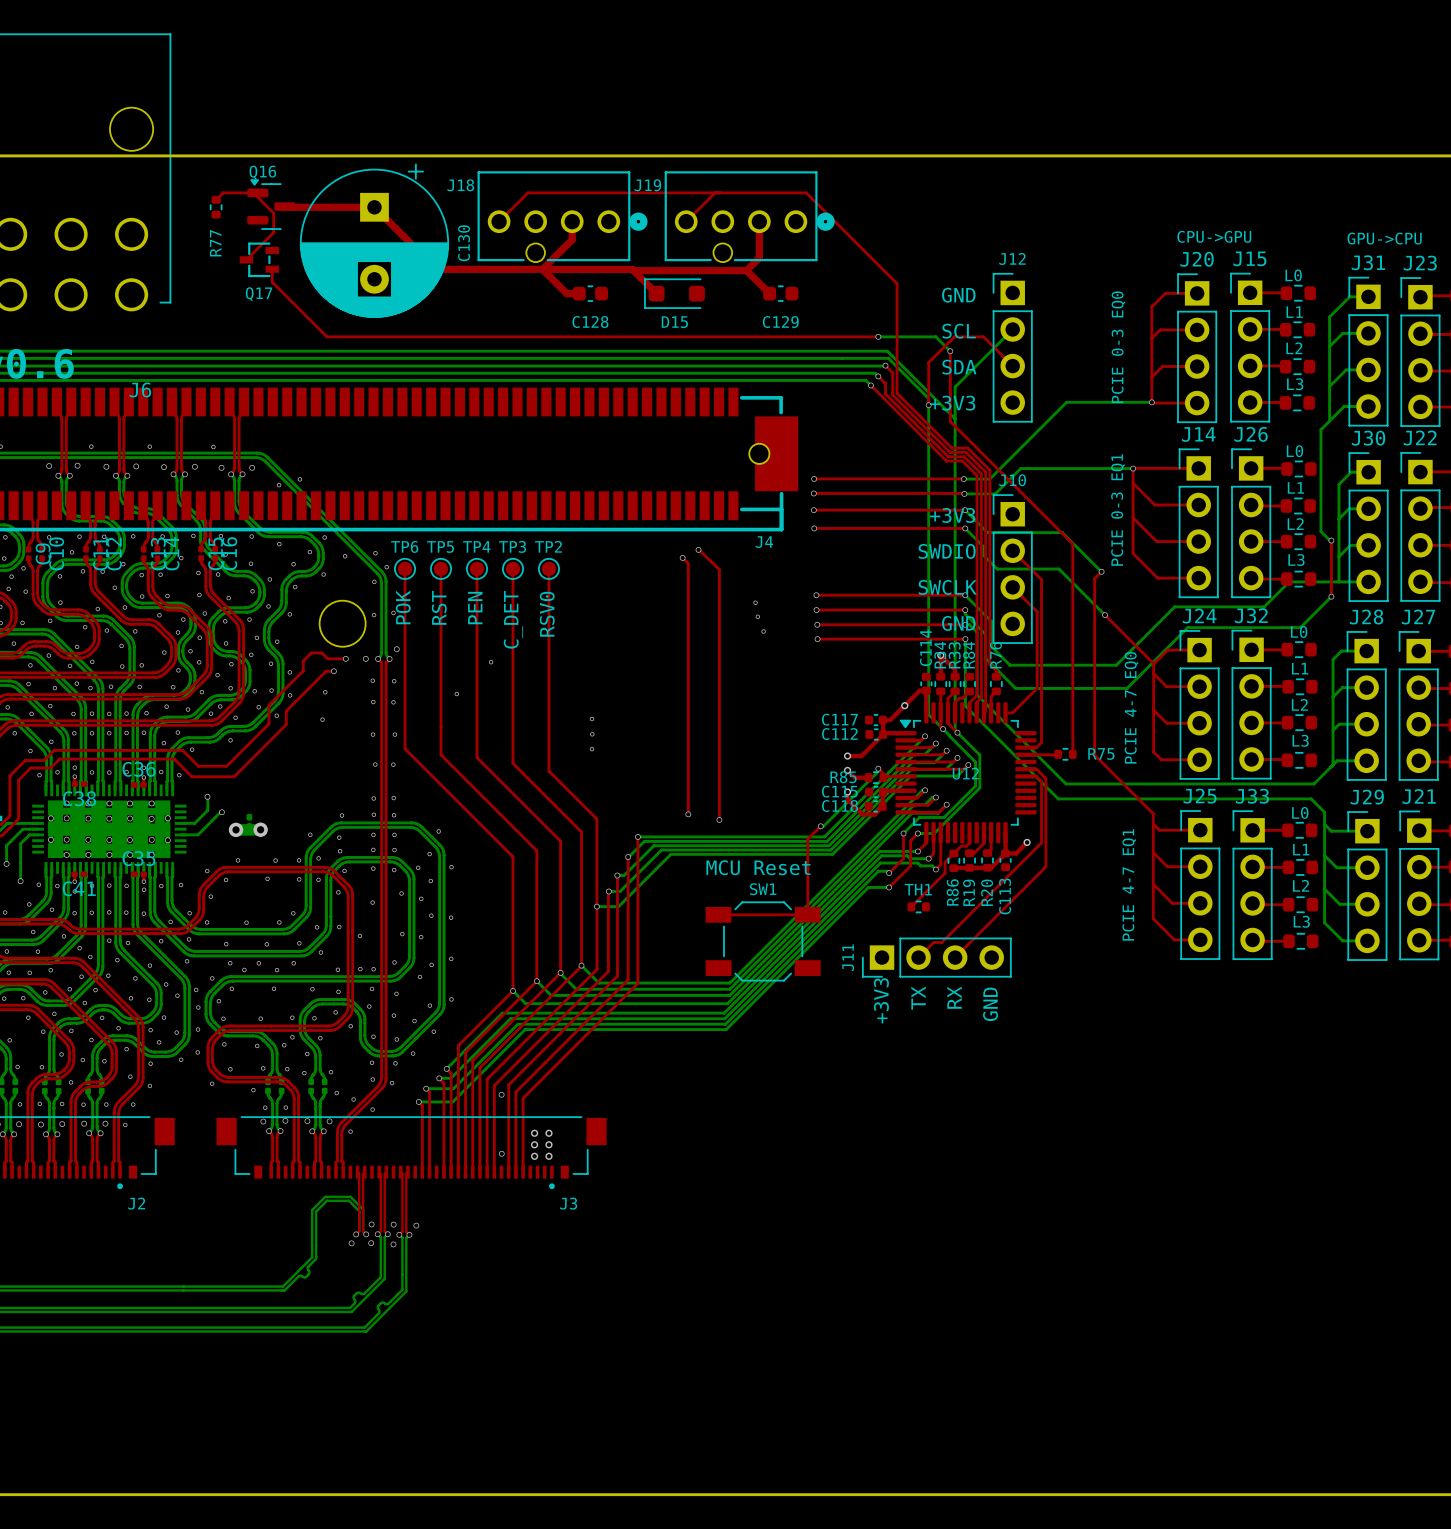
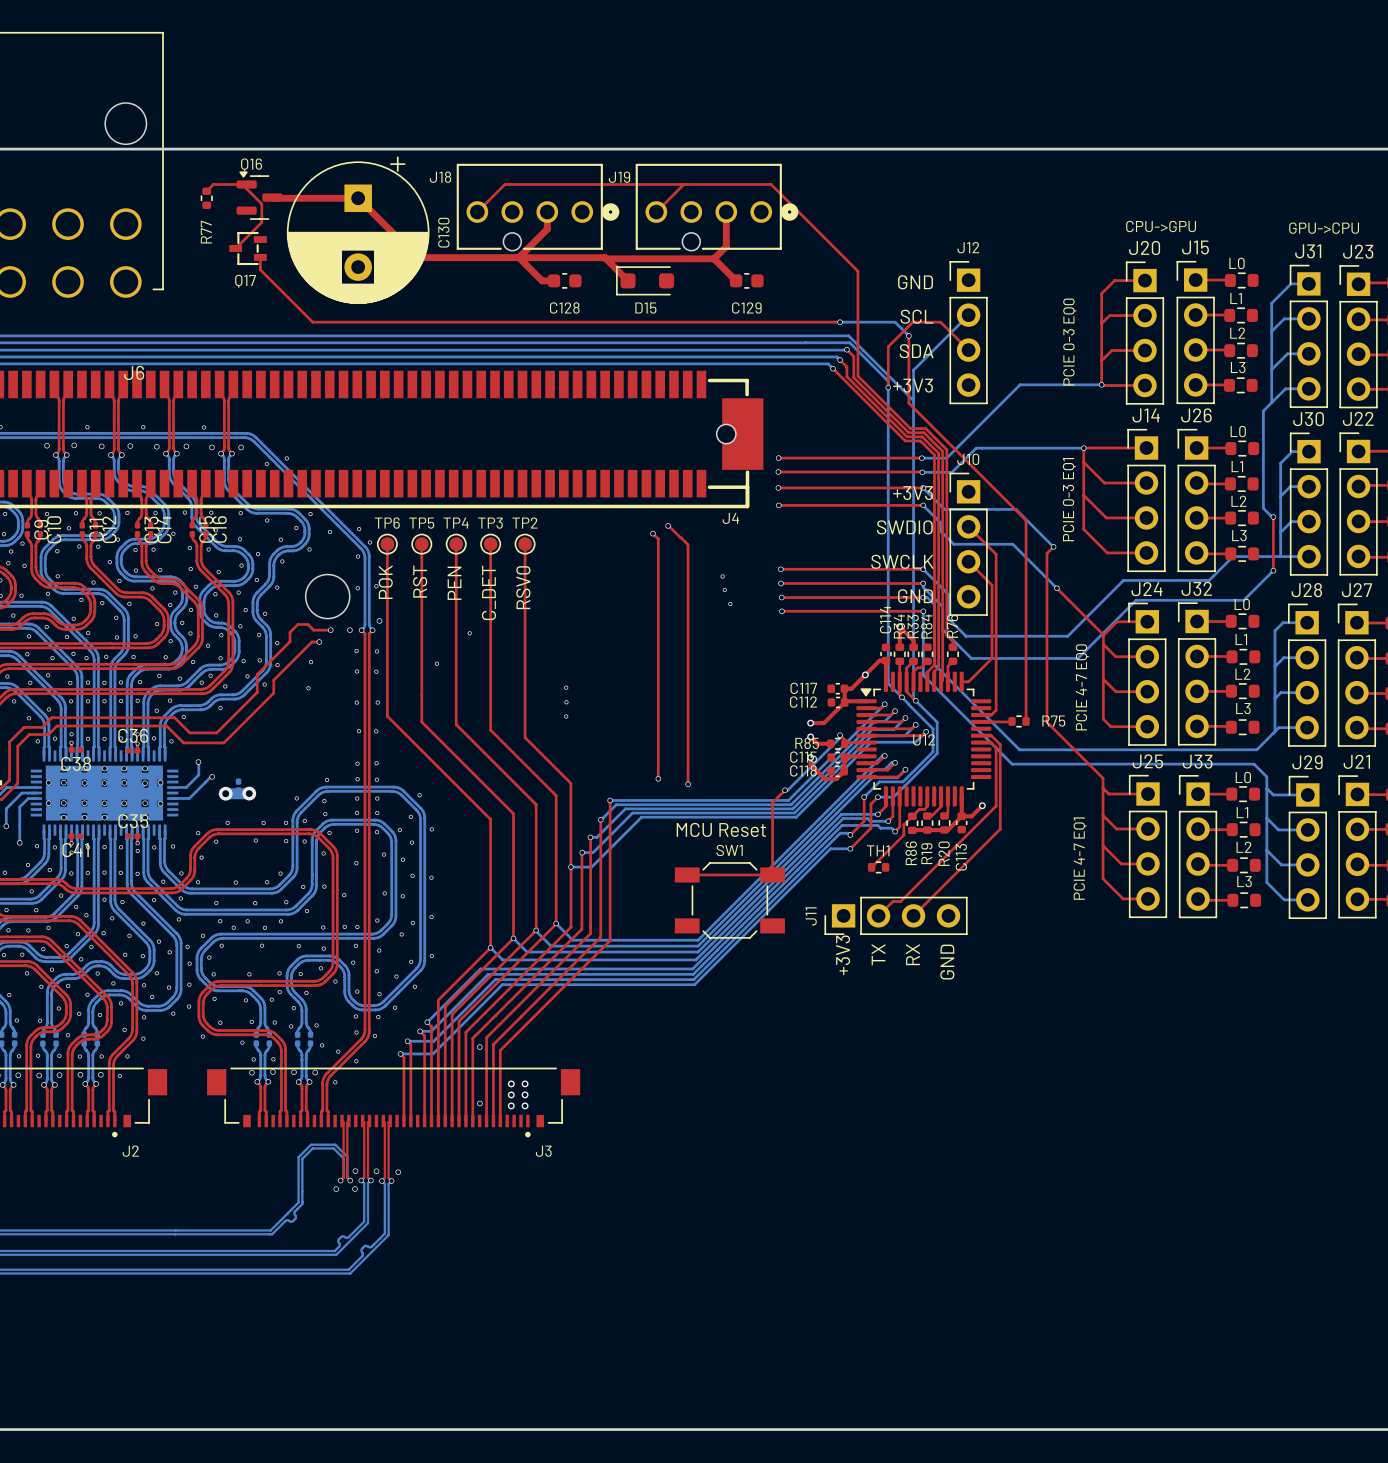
via: (393, 1244) -> none

